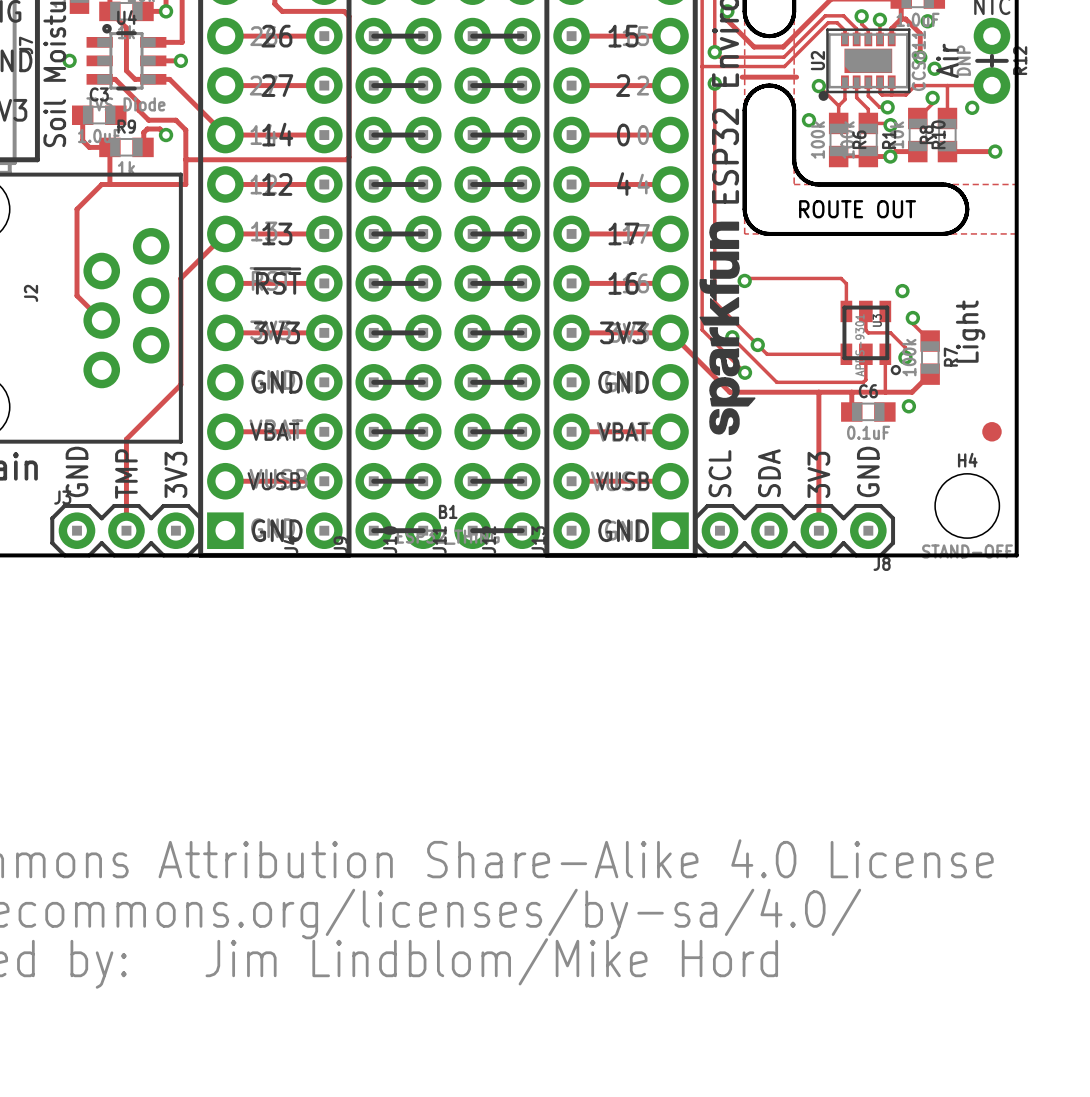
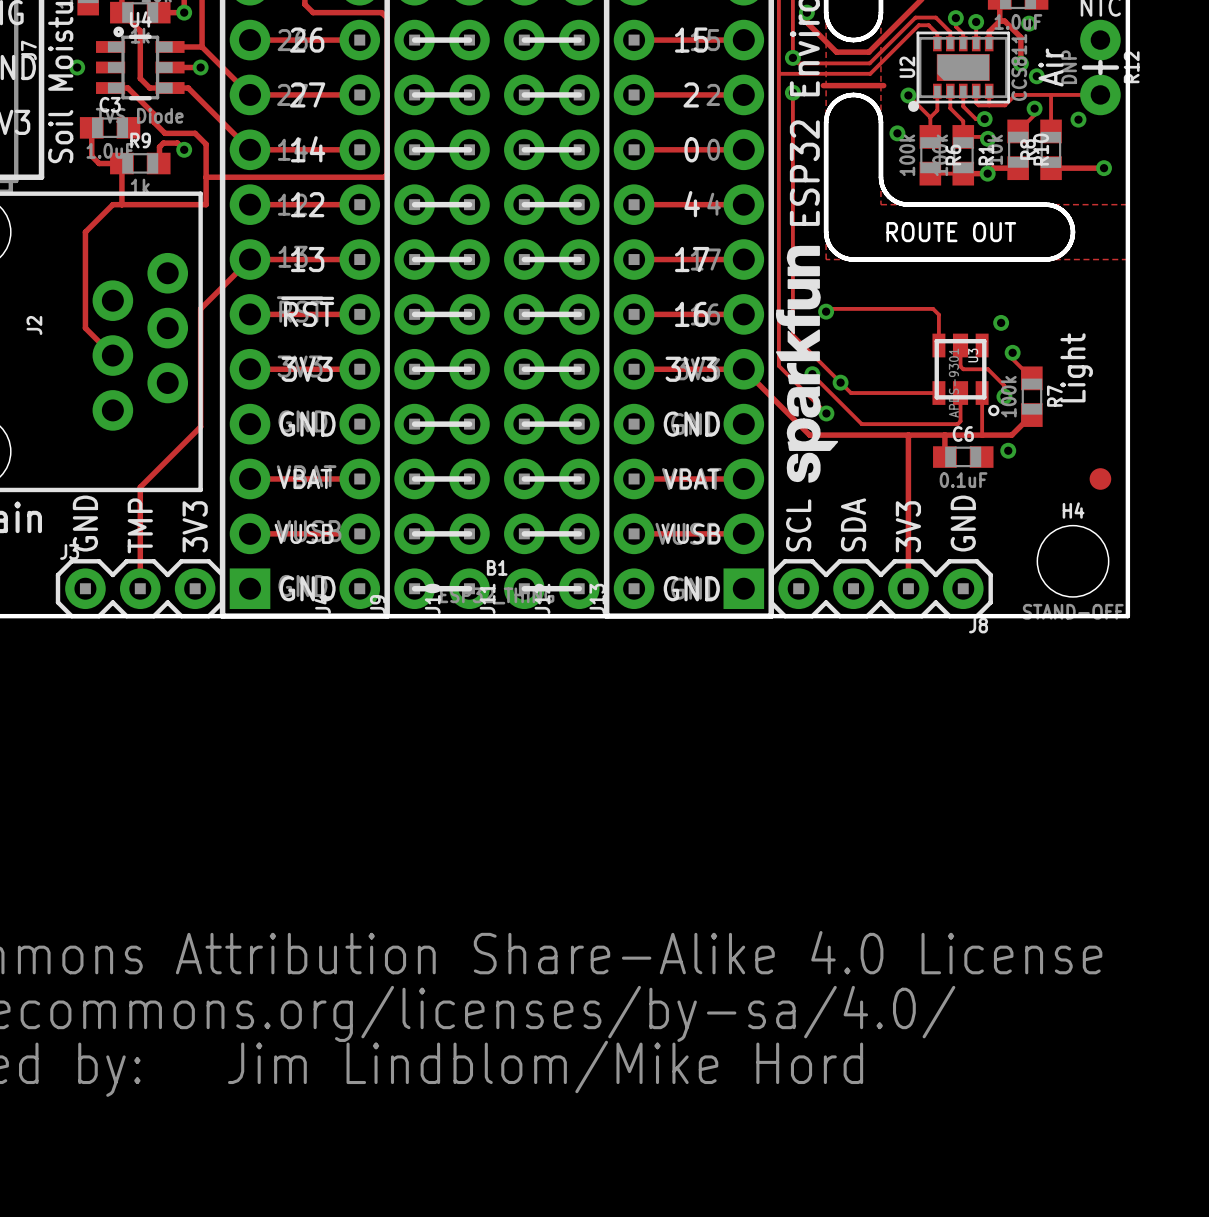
track: none -> (202, 46) (250, 94)

